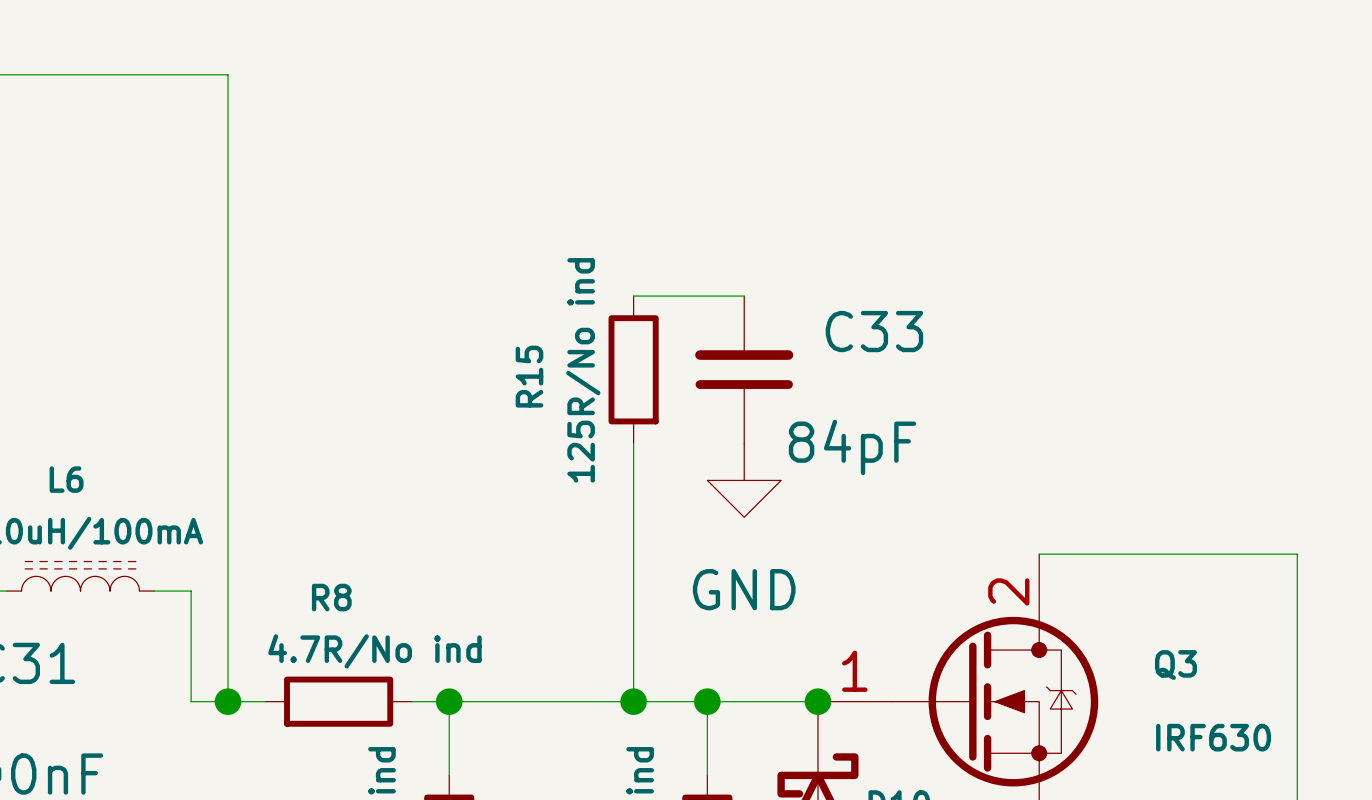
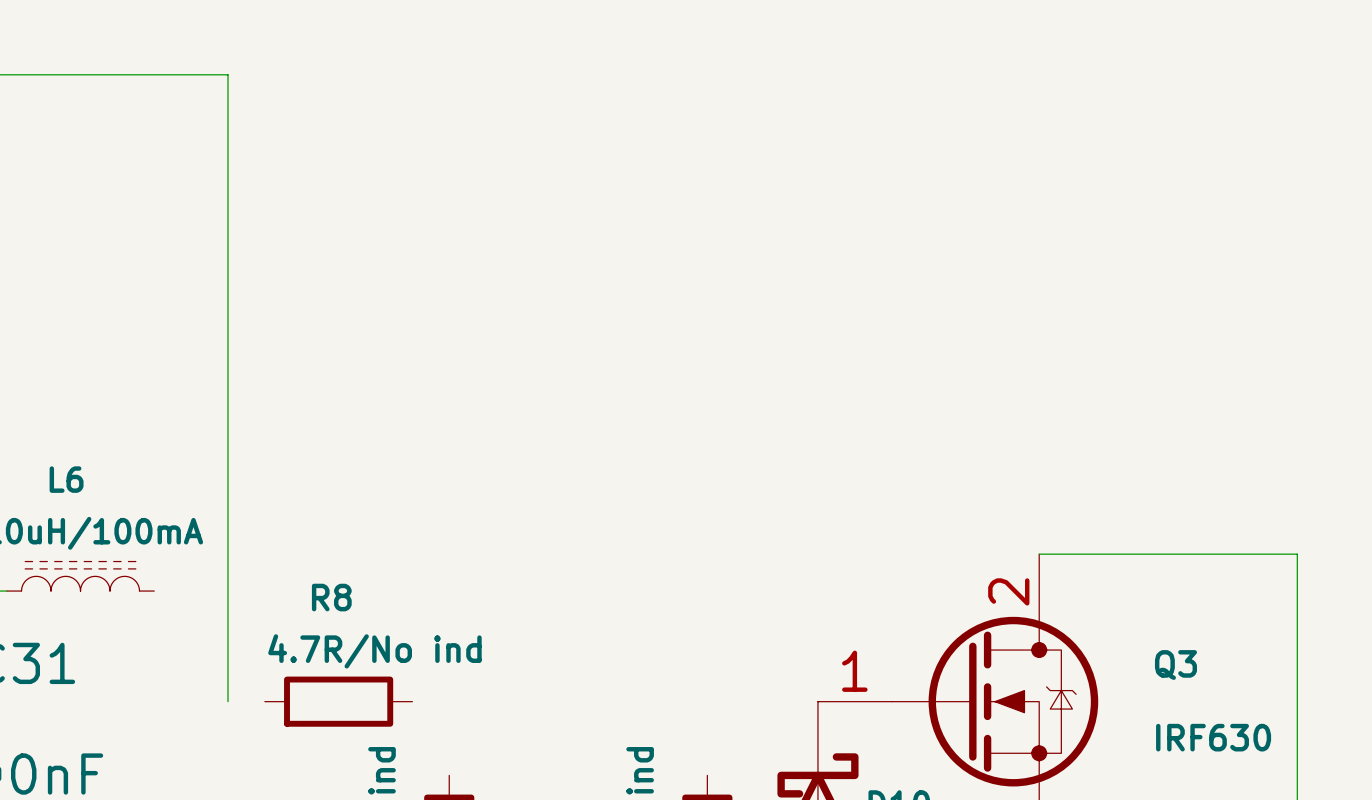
wire: (633, 296) (744, 296) -> none
R15: 125R/No ind (633, 369) -> none
C33: 84pF (744, 369) -> none
wire: (633, 443) (633, 701) -> none
power symbol: GND (744, 480) -> none
wire: (154, 591) (191, 591) (191, 701) (264, 701) -> none
junction: (228, 701) -> none
wire: (412, 701) (817, 701) -> none
wire: (449, 701) (449, 775) -> none
junction: (449, 701) -> none
junction: (633, 701) -> none
wire: (707, 701) (707, 775) -> none
junction: (707, 701) -> none
junction: (817, 701) -> none

